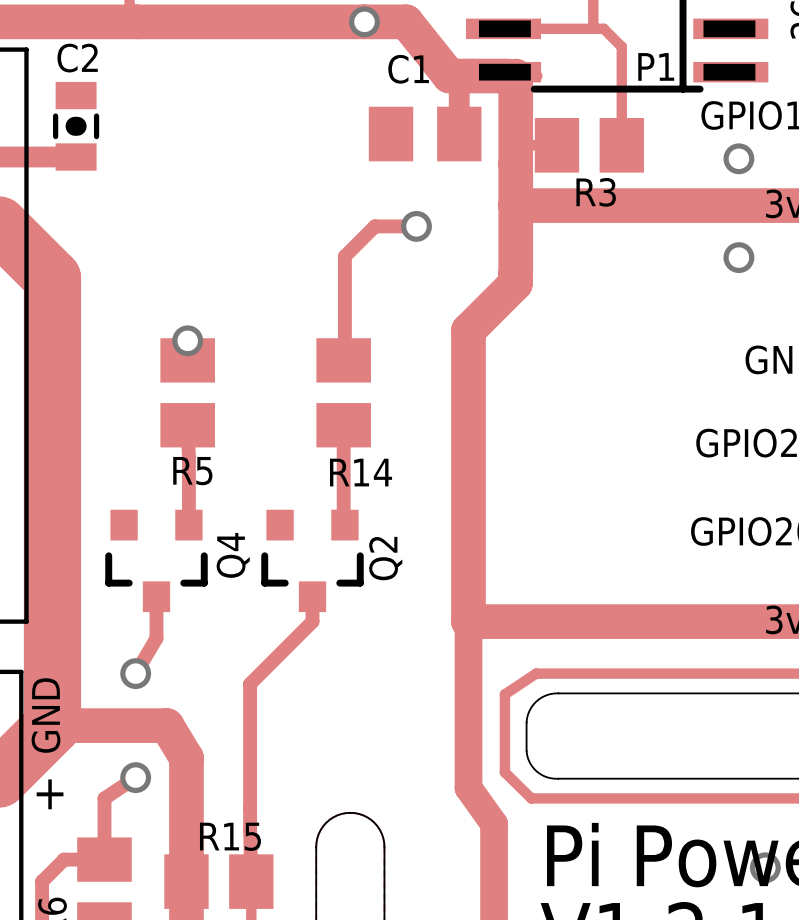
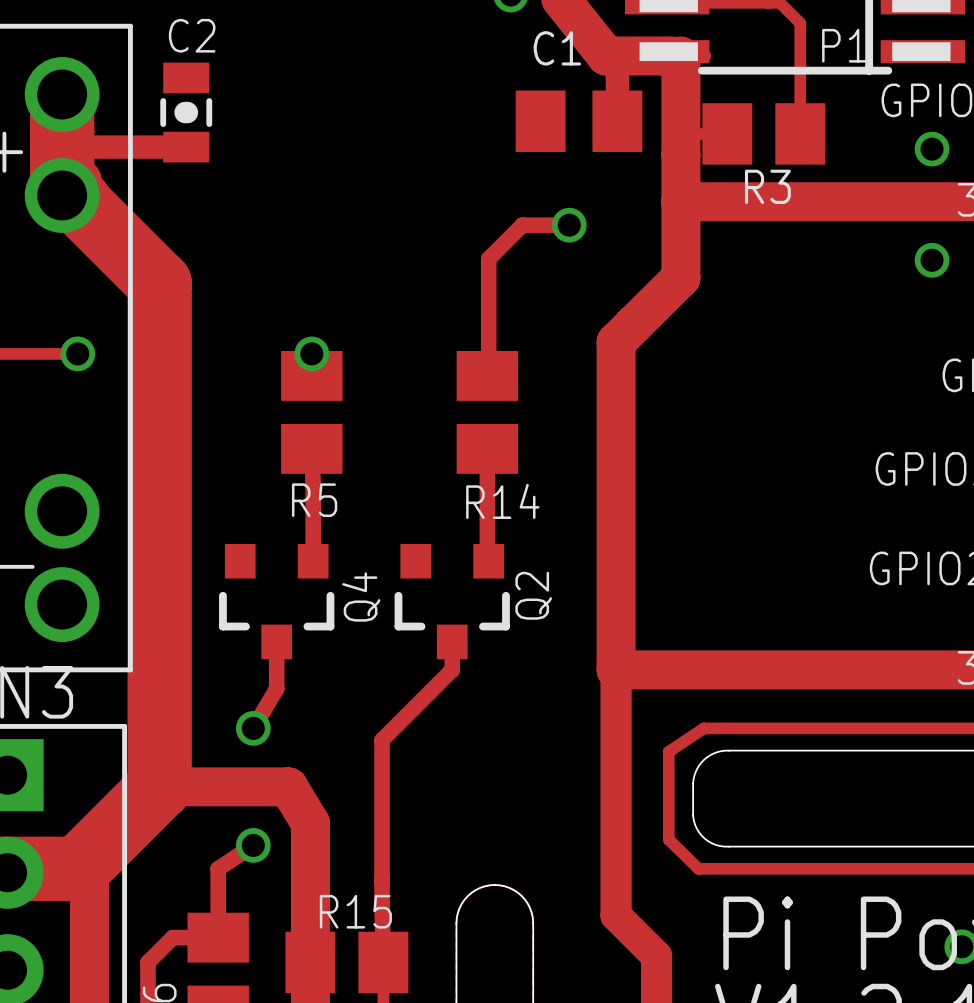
track: (515, 273) (515, 283) (468, 330) (468, 788) (494, 823) (494, 876) -> (680, 277) (616, 342) (616, 669)
track: none -> (616, 669) (616, 915) (656, 956)
text: GND (46, 715) -> none
text: + (50, 794) -> none

